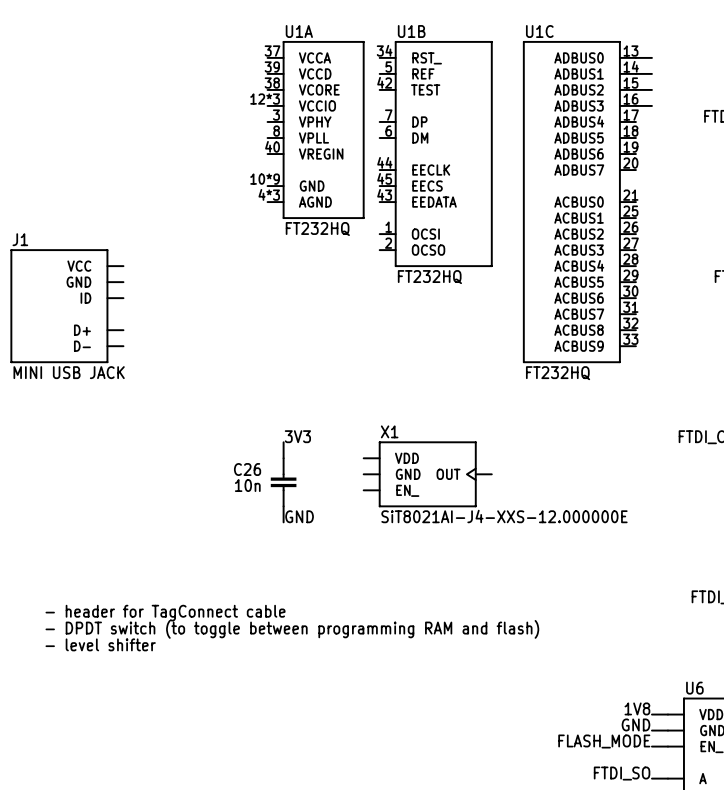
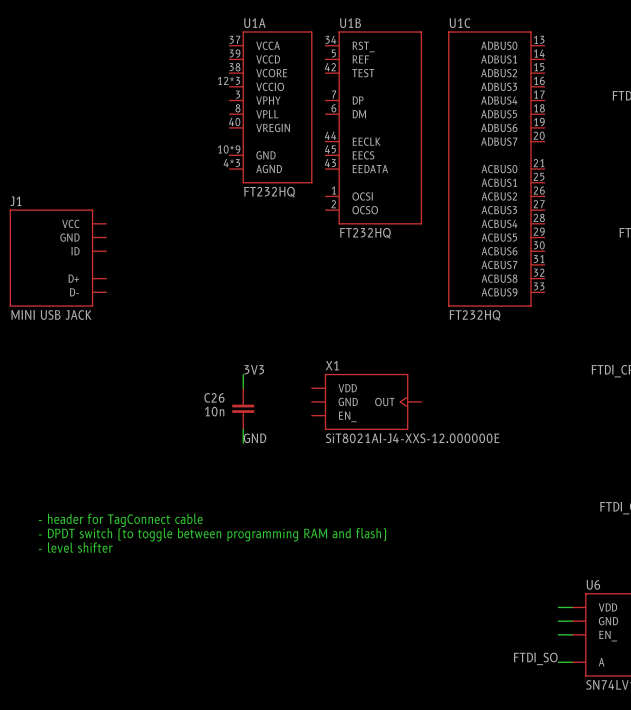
wire: (635, 57) (651, 57) -> none
wire: (635, 73) (651, 73) -> none
wire: (635, 89) (651, 89) -> none
wire: (635, 105) (651, 105) -> none
label: 1V8 (637, 708) -> none
label: GND (635, 724) -> none
label: FLASH_MODE (604, 741) -> none

